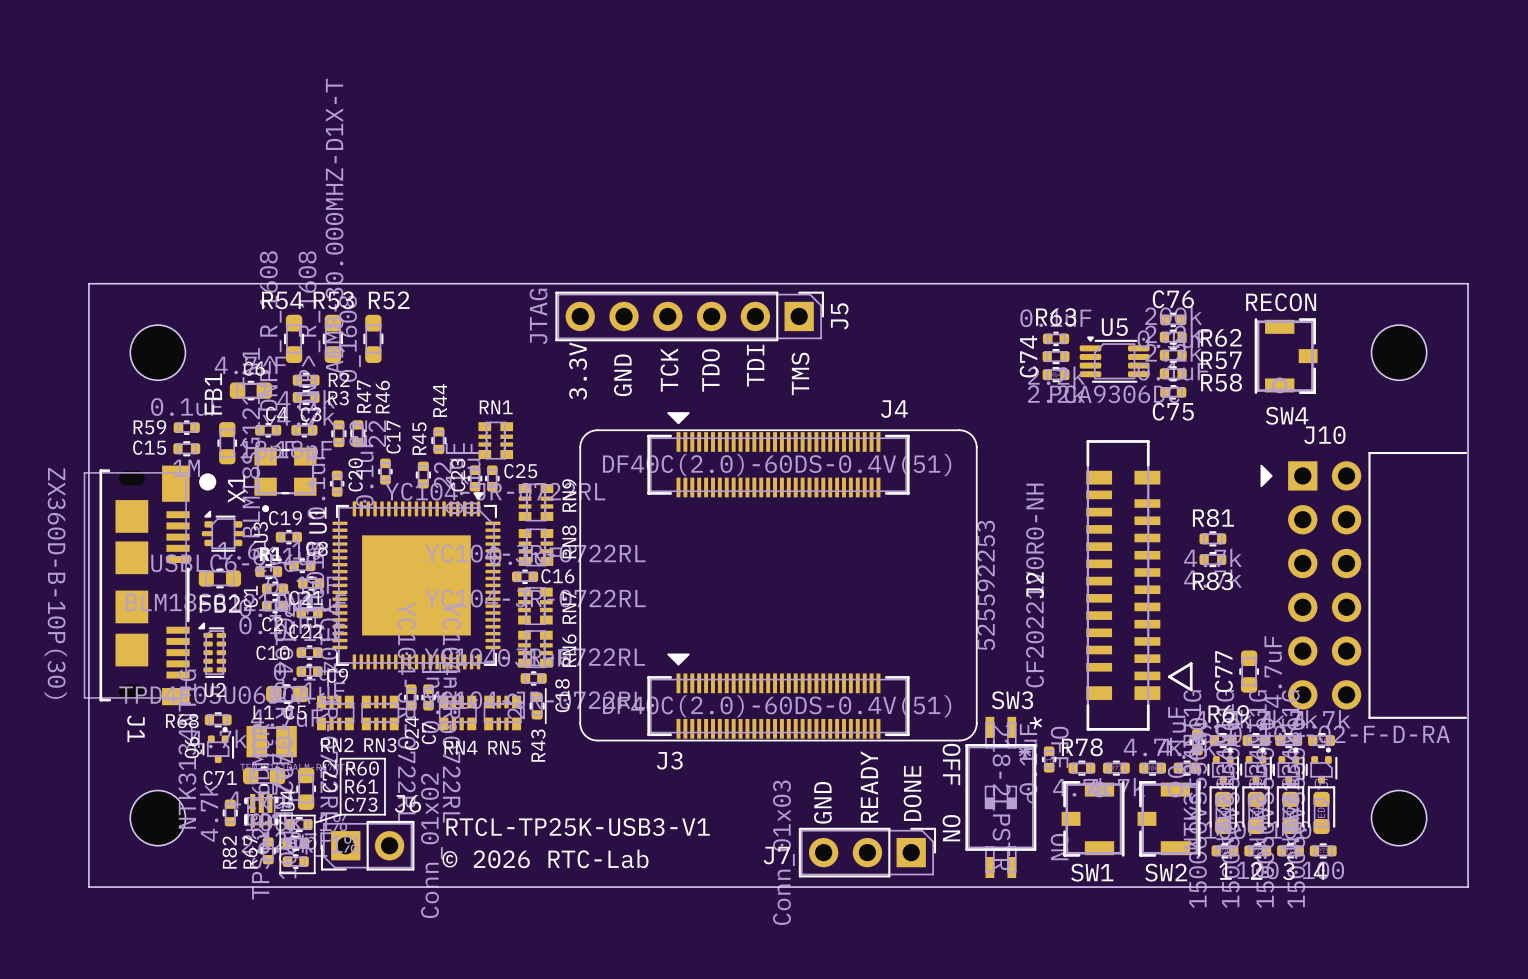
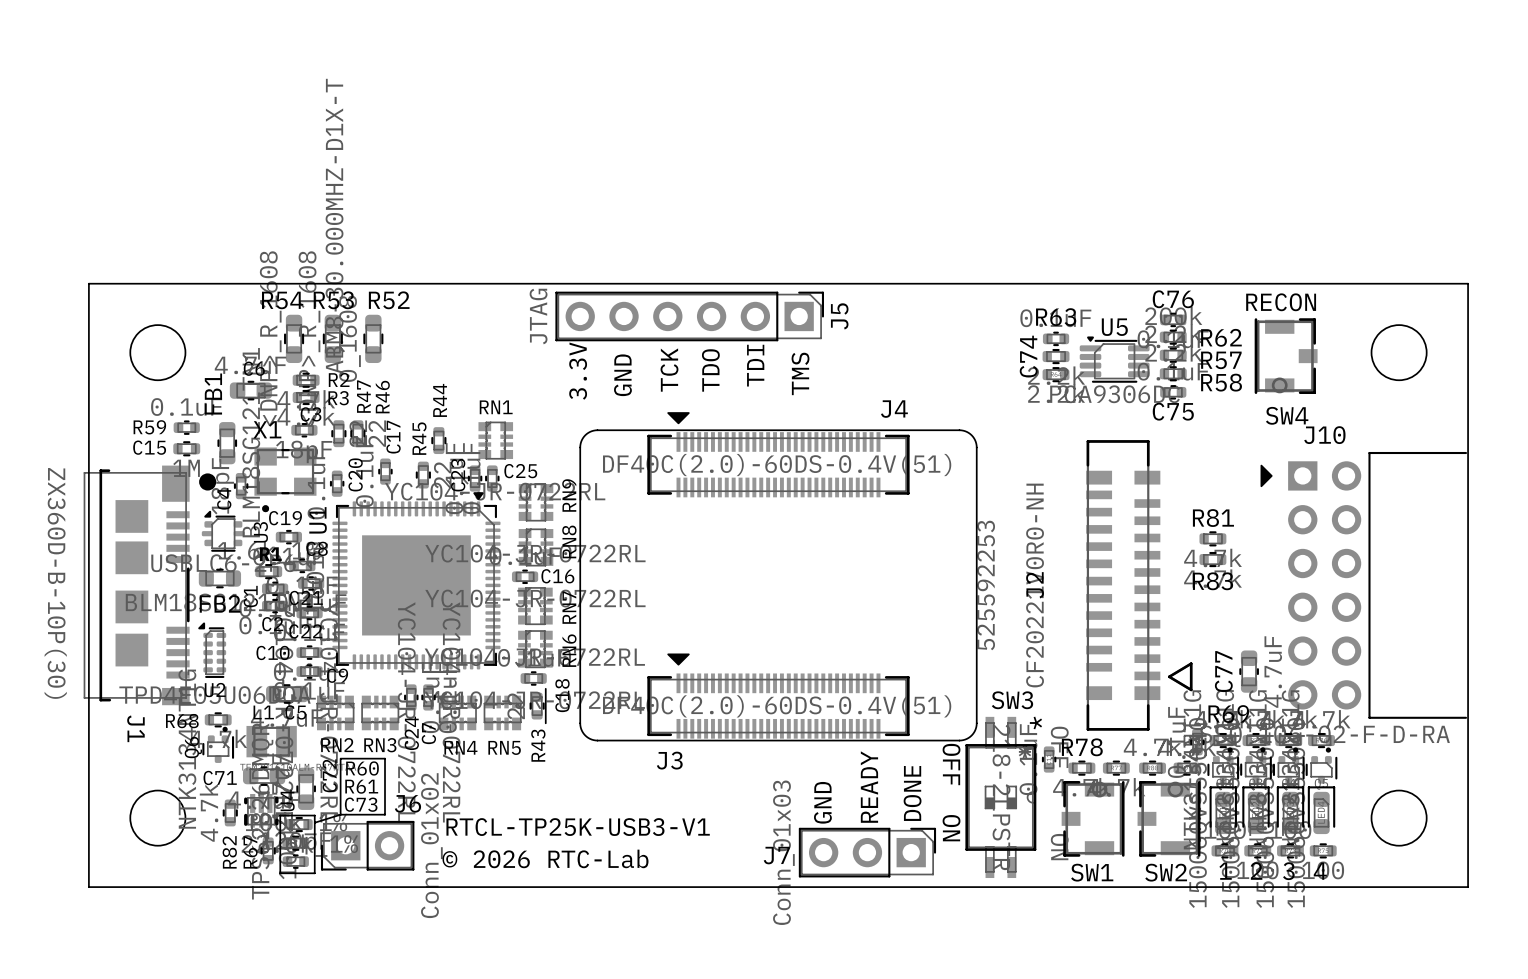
C4 rotation: 0° (268, 430) -> 90° clockwise (241, 486)
C4 position: (268, 430) -> (241, 486)
X1 name rotation: 0° (236, 489) -> 90° clockwise (267, 429)
X1 name position: X1 (236, 489) -> X1 (267, 429)

